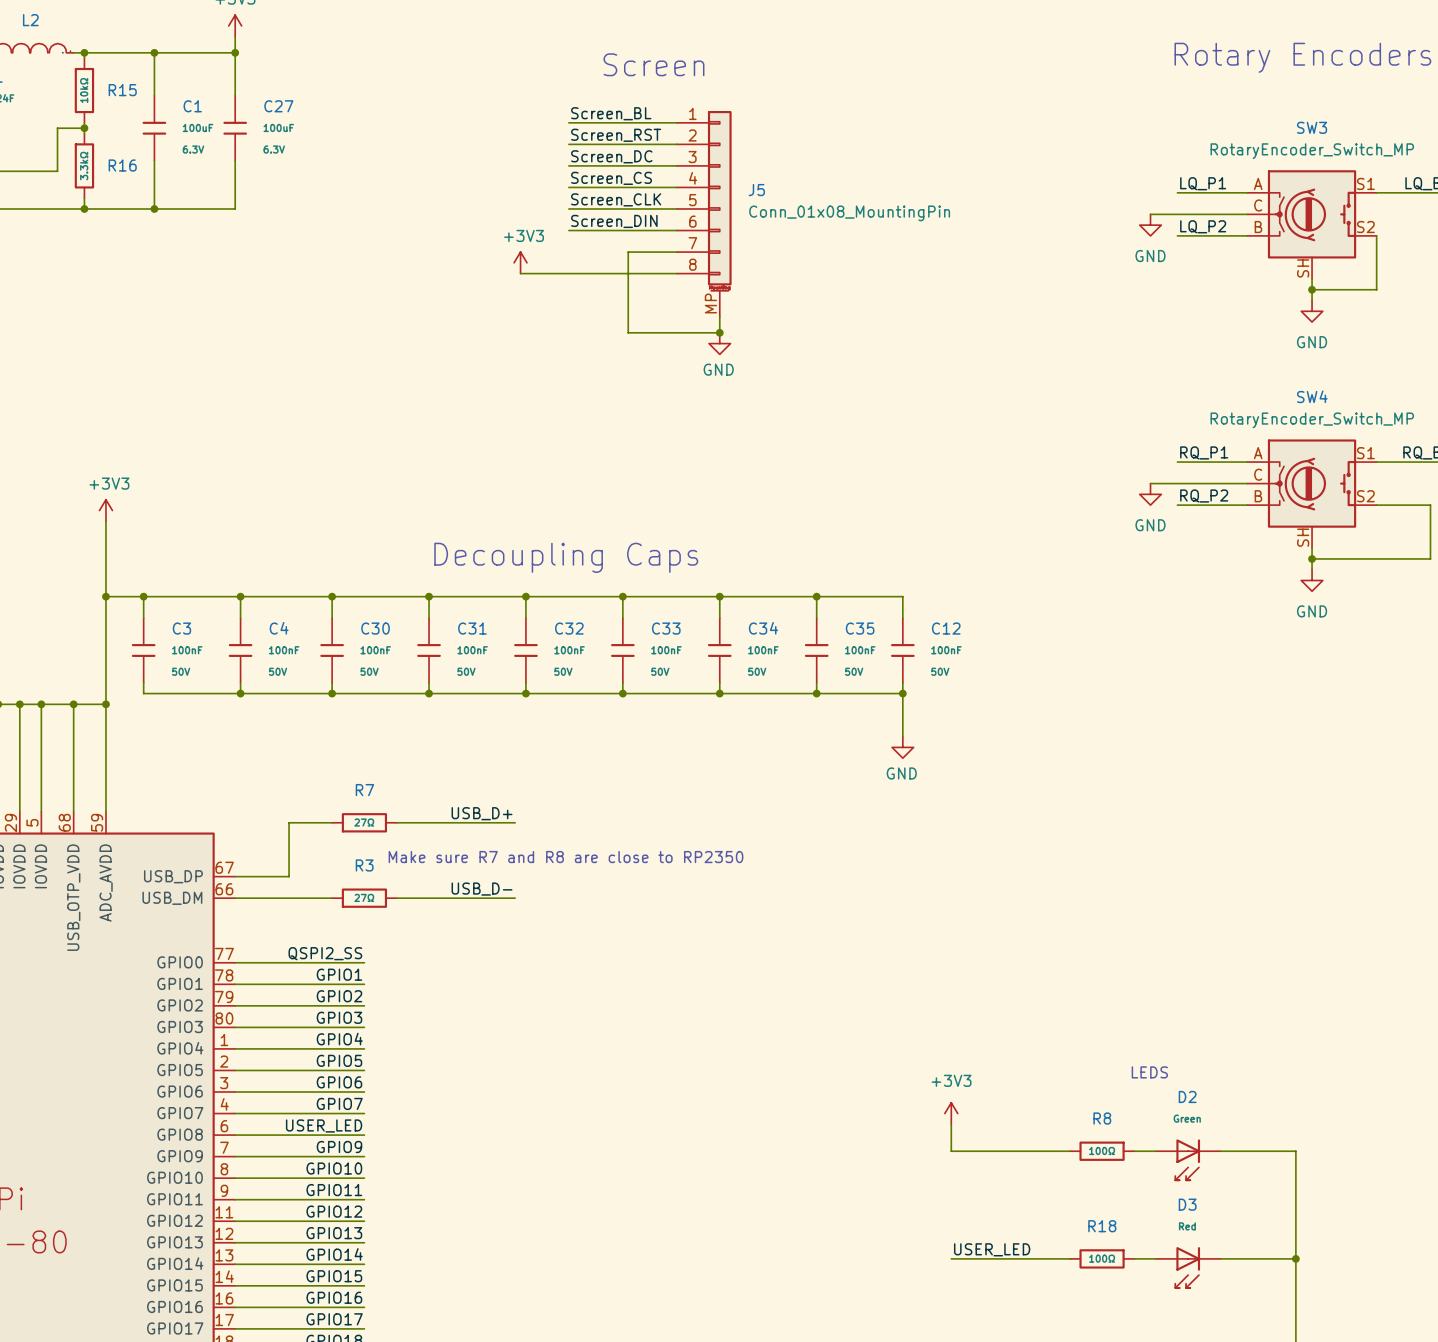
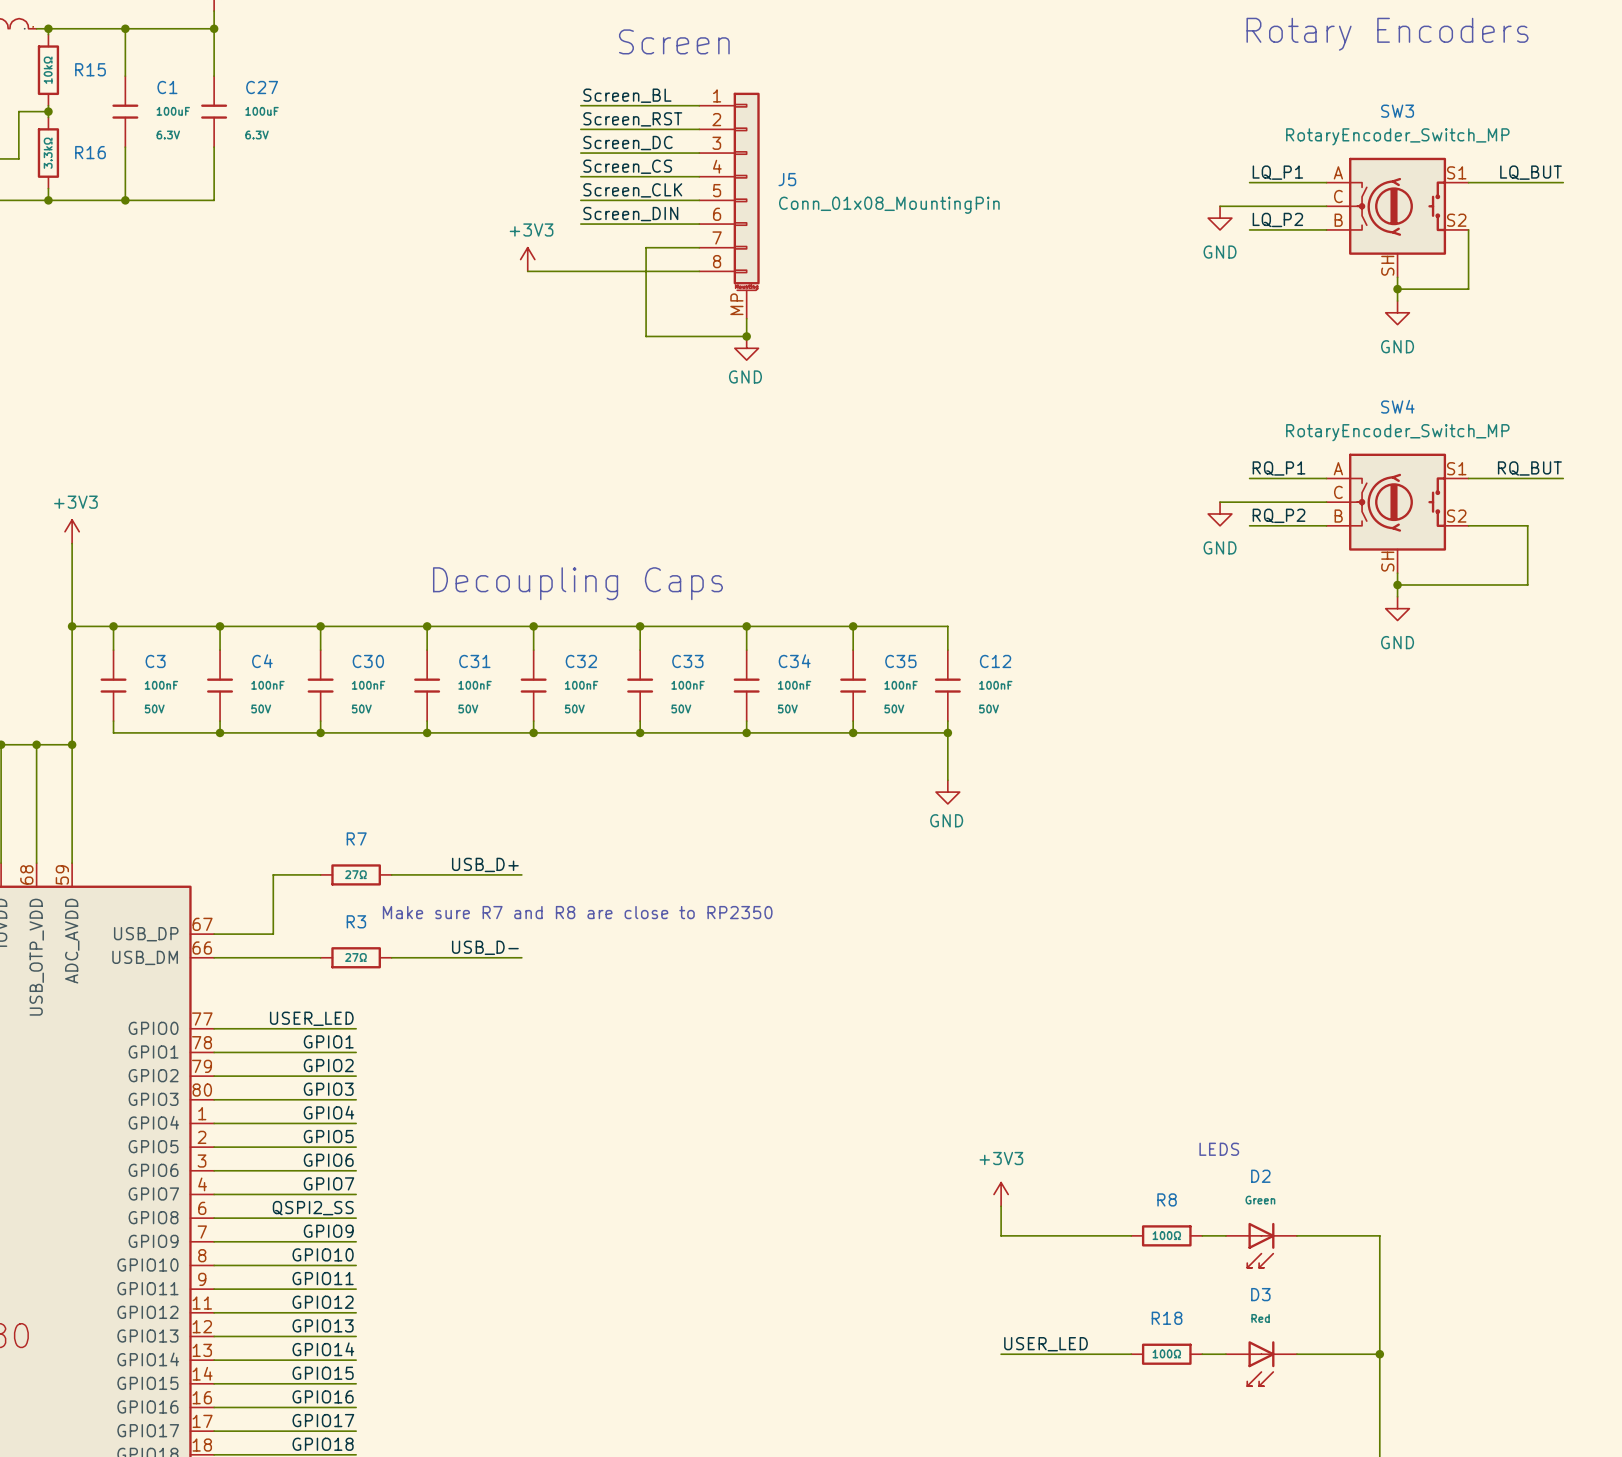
label: QSPI2_SS (325, 953) -> USER_LED (311, 1018)
label: USER_LED (324, 1125) -> QSPI2_SS (313, 1208)

